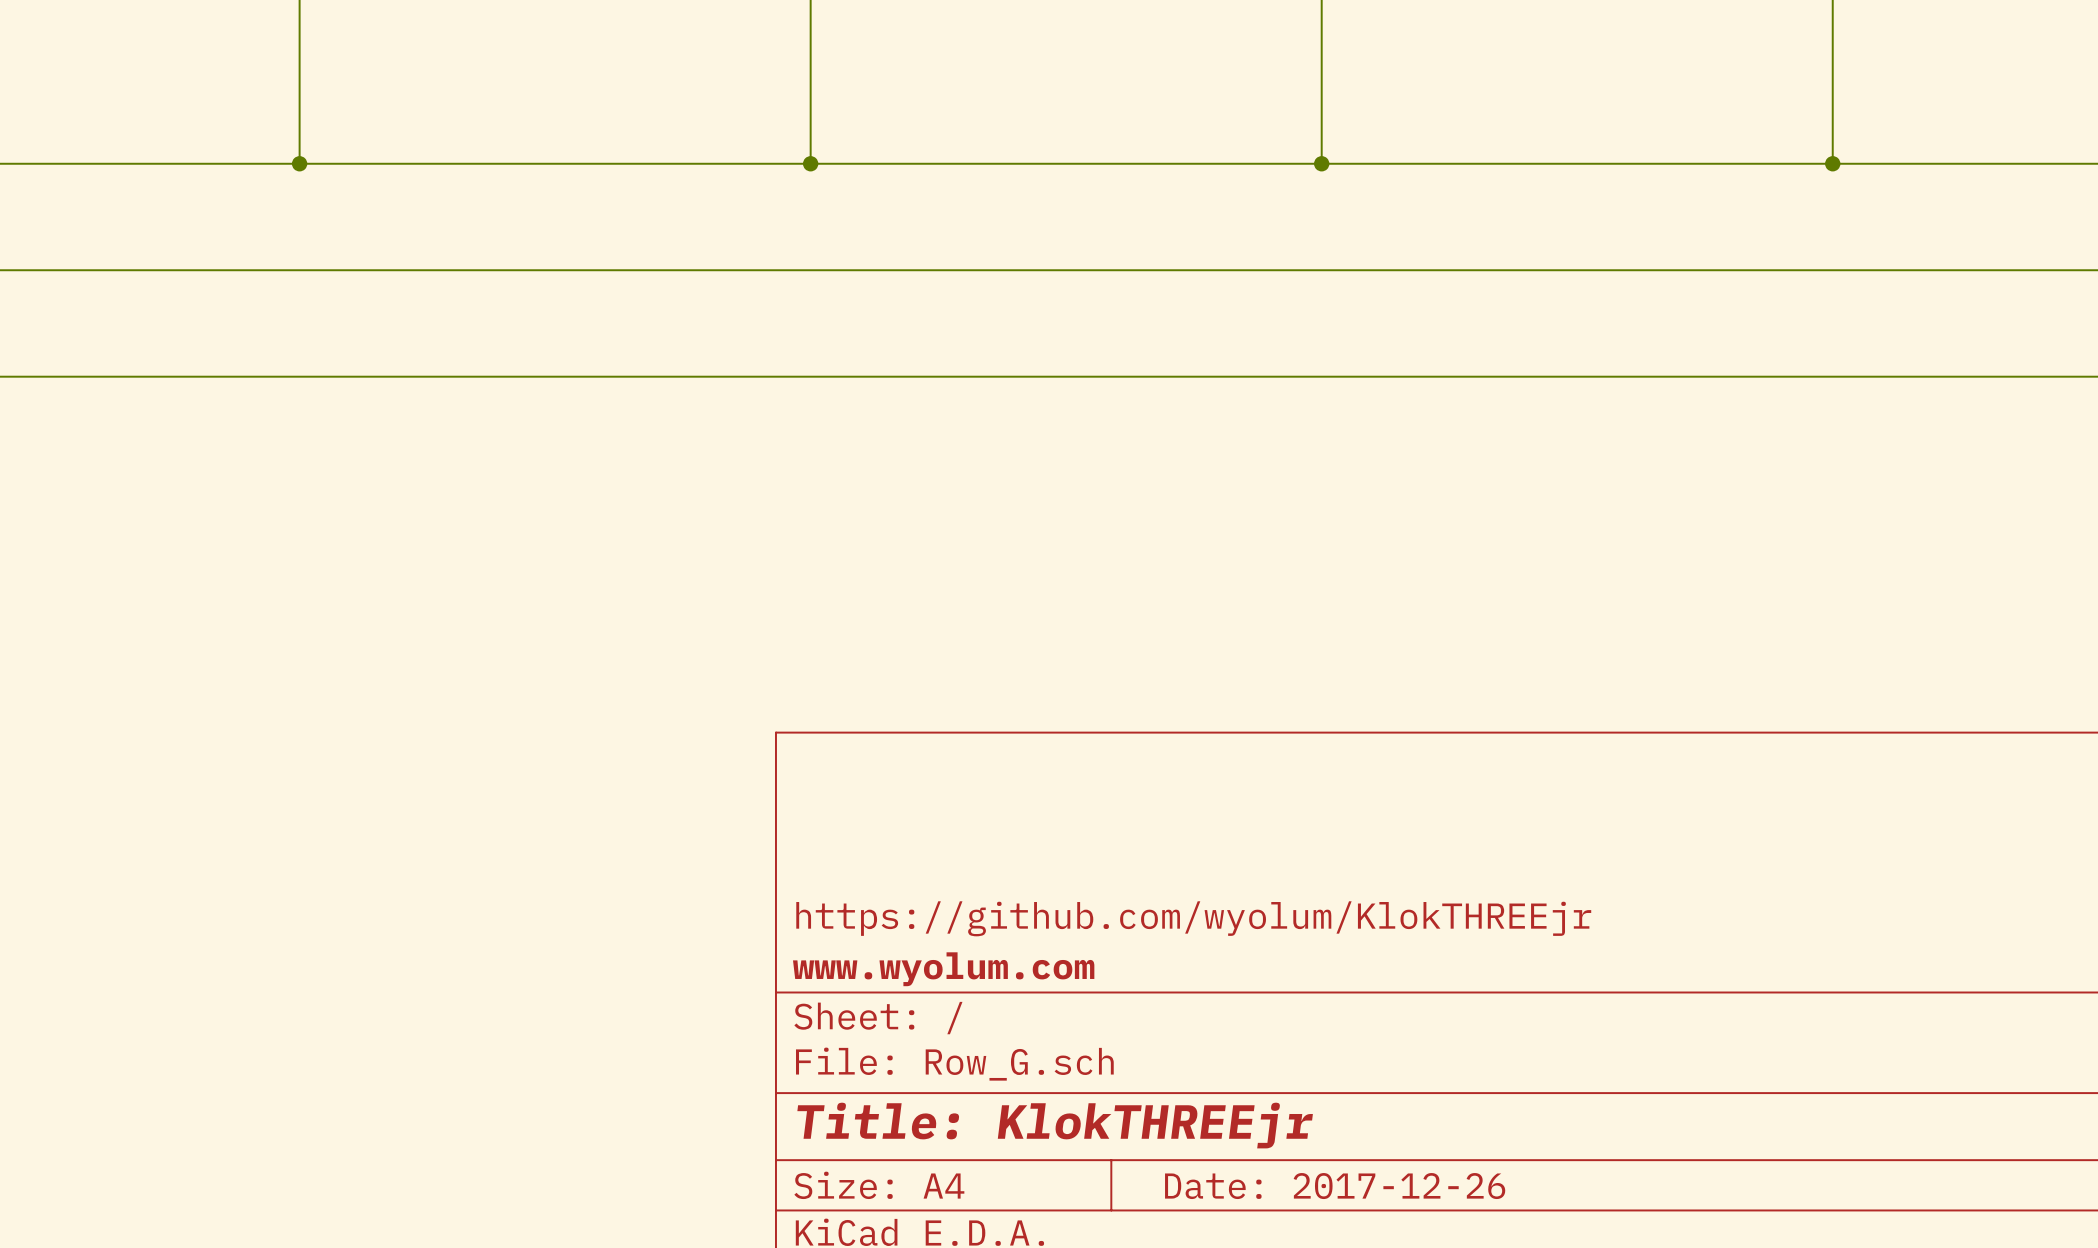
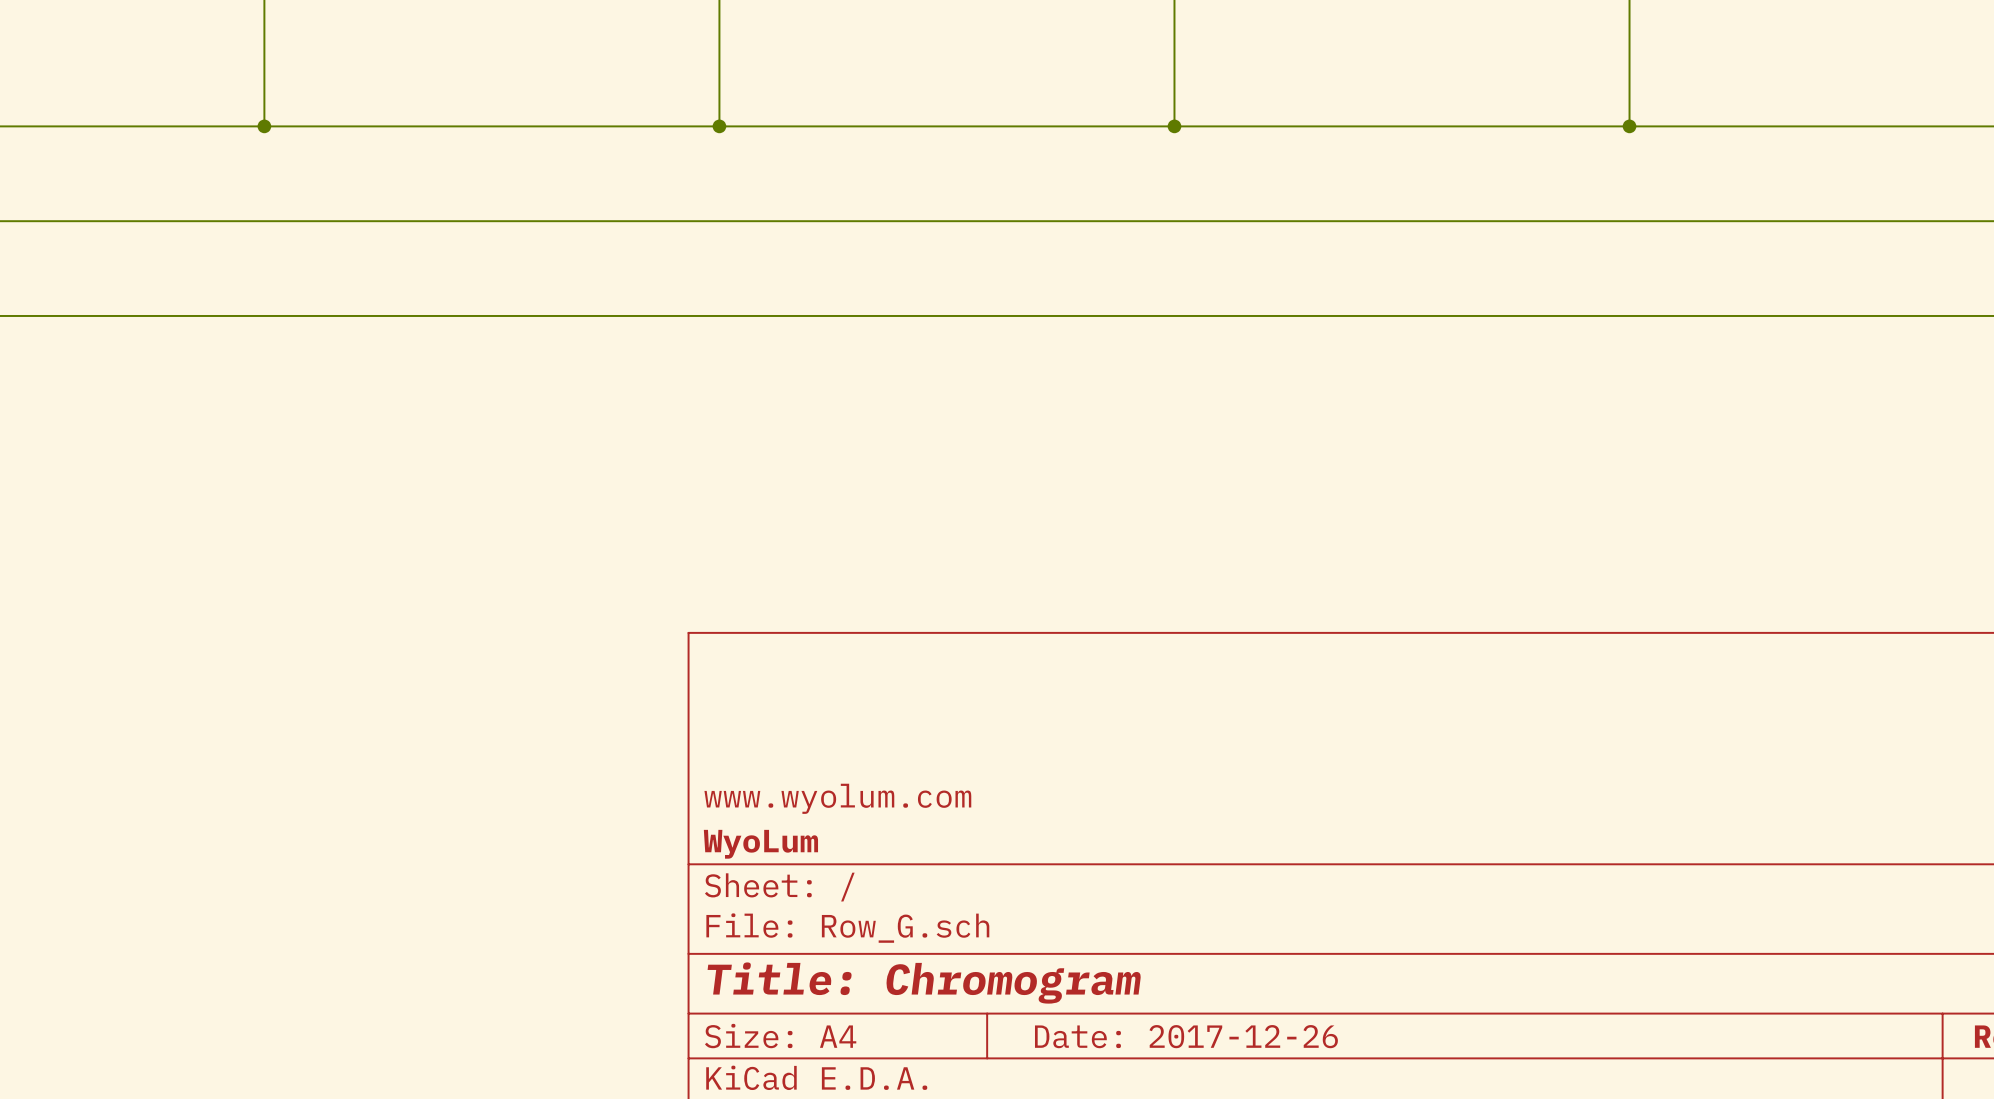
title block: https://github.com/wyolum/KlokTHREEjr (1193, 918) -> www.wyolum.com (837, 798)
title block: www.wyolum.com (943, 969) -> WyoLum (760, 844)
title block: Title: KlokTHREEjr (1055, 1125) -> Title: Chromogram (924, 983)

